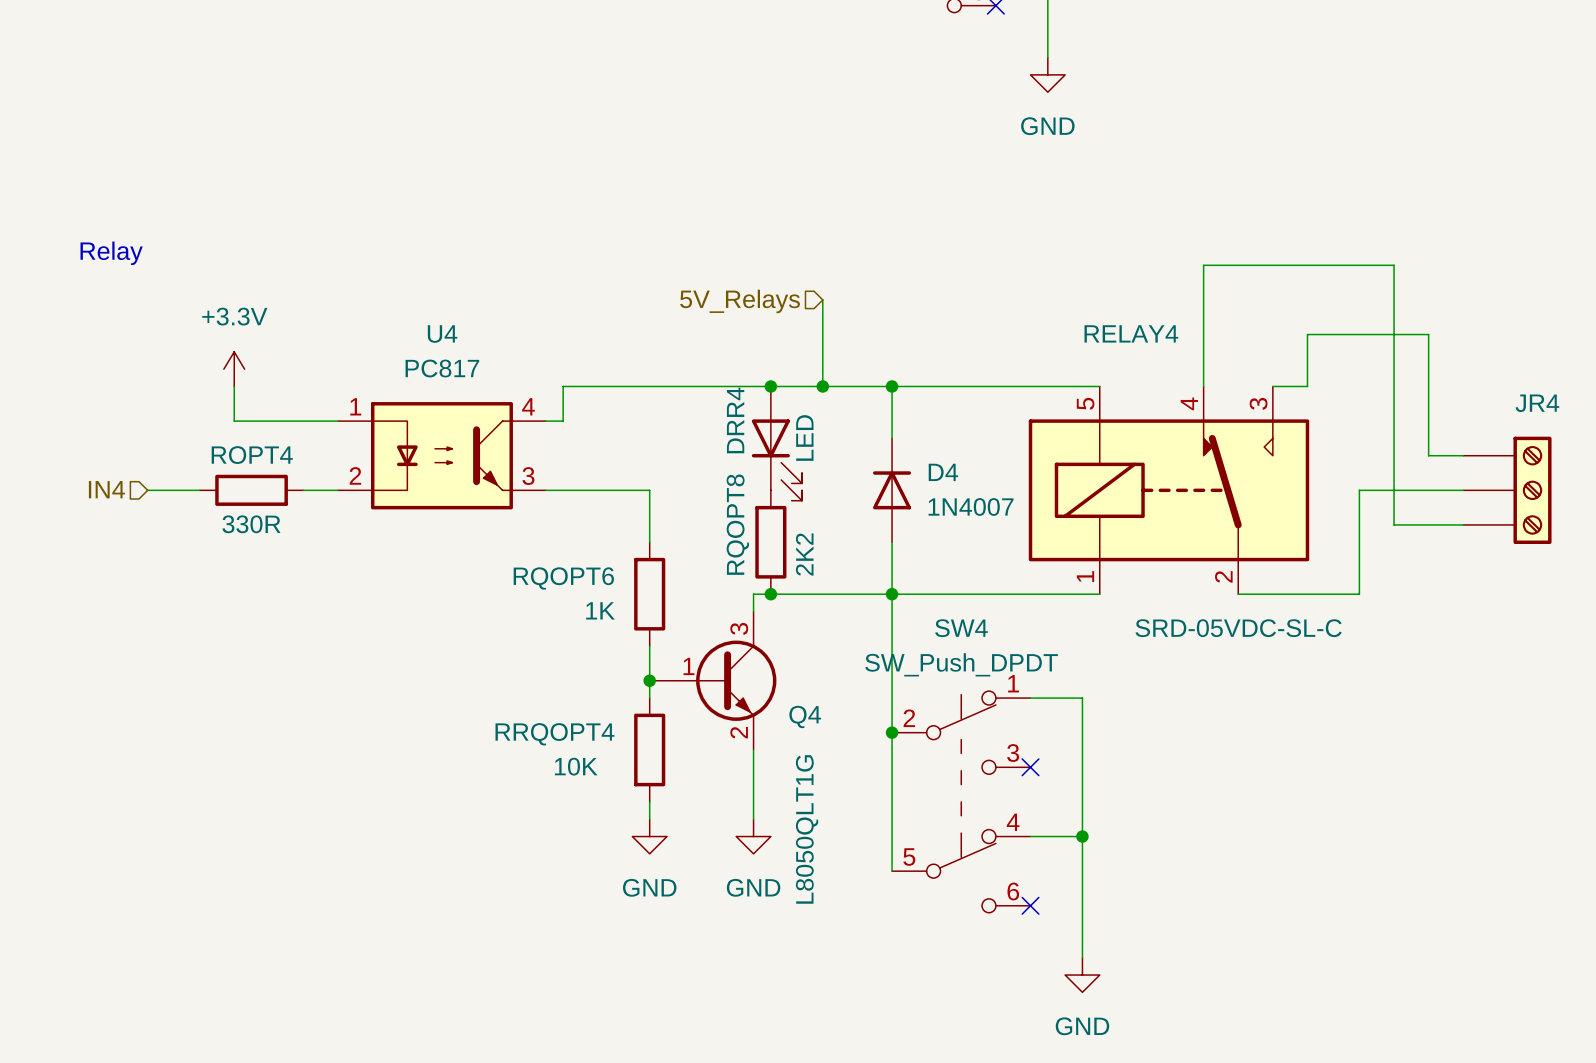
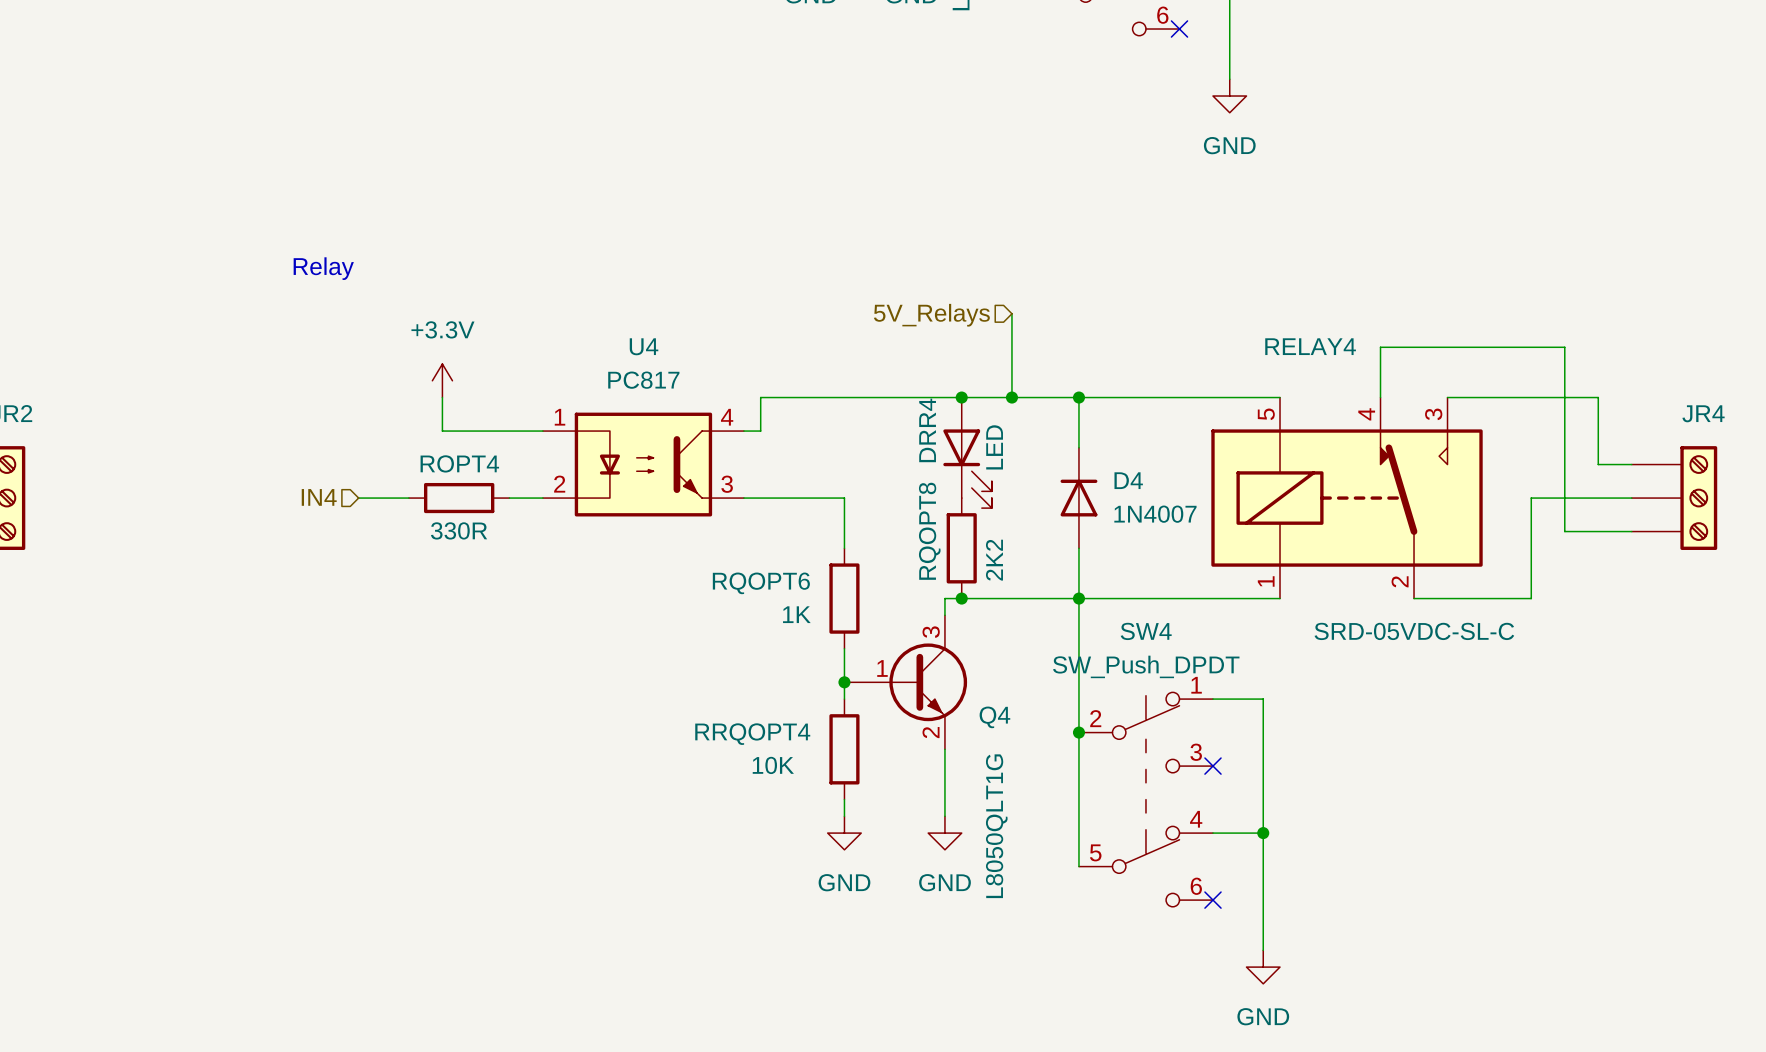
wire: (1203, 334) (1203, 265) (1394, 265) (1394, 334) (1428, 334) (1428, 386) -> (1481, 397) (1598, 397)
wire: (1307, 334) (1307, 386) -> (1481, 347) (1380, 347)

